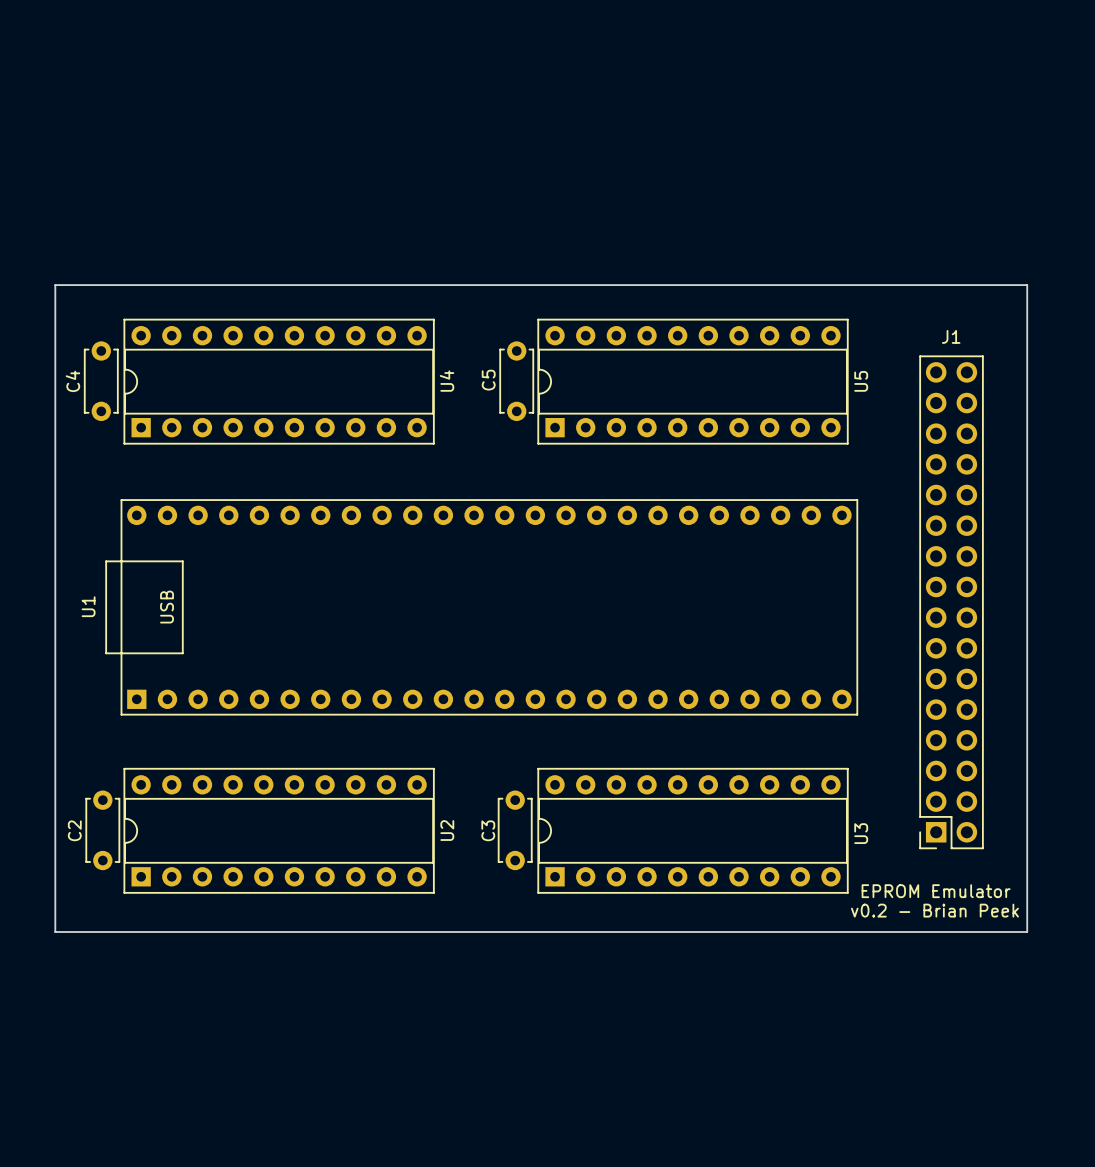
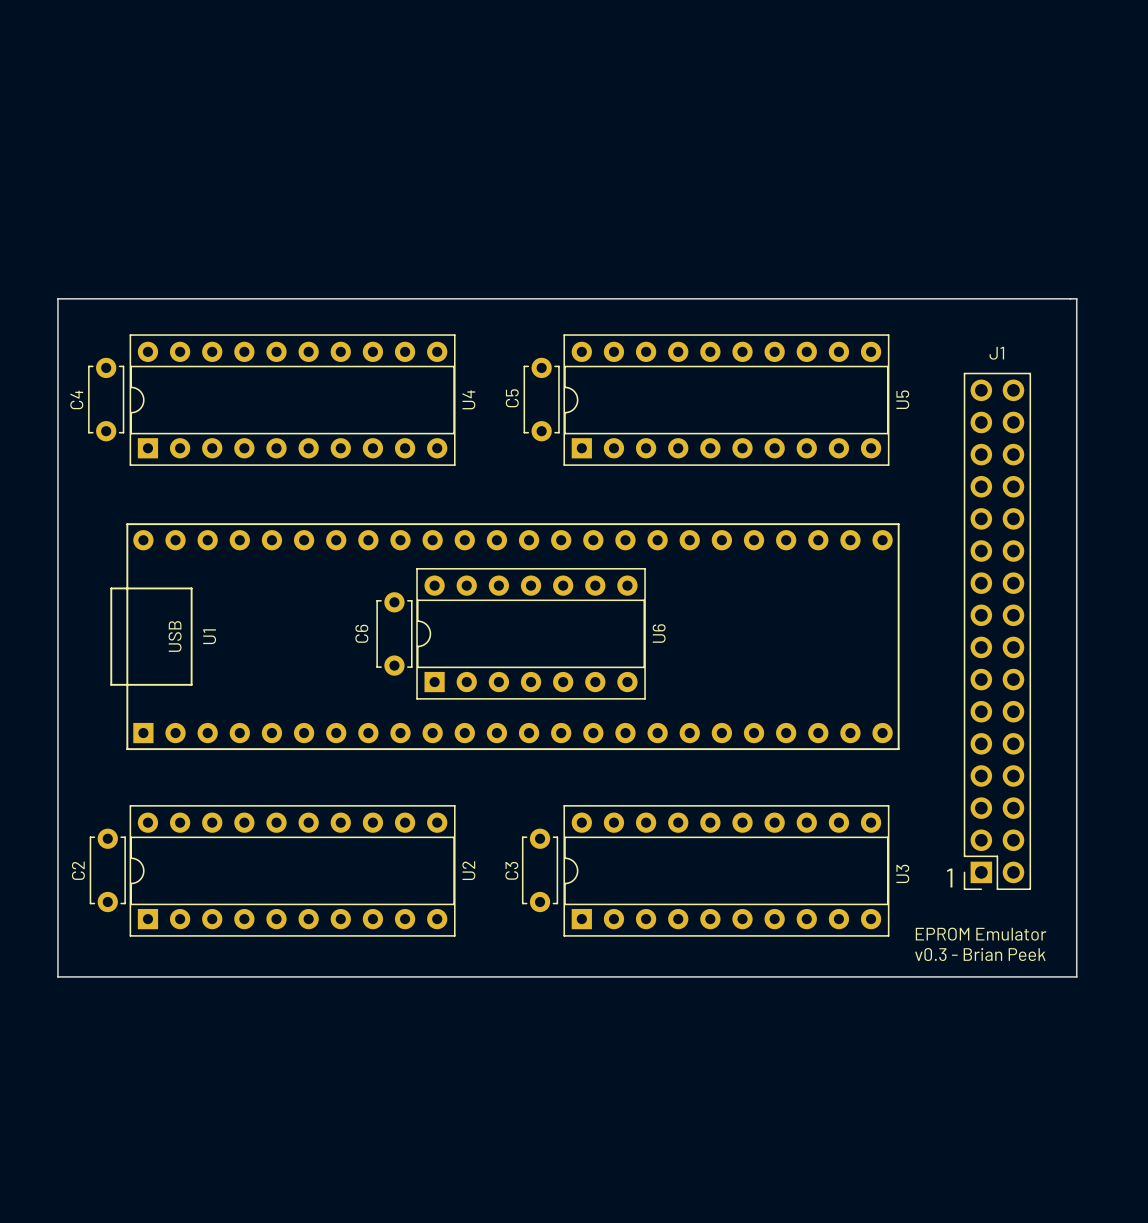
C6: none -> (394, 633)
U6: none -> (531, 633)
U1 name position: U1 (88, 606) -> U1 (209, 636)
text: none -> 1 (949, 878)
text: v0.2 - Brian Peek (934, 910) -> v0.3 - Brian Peek (980, 954)

